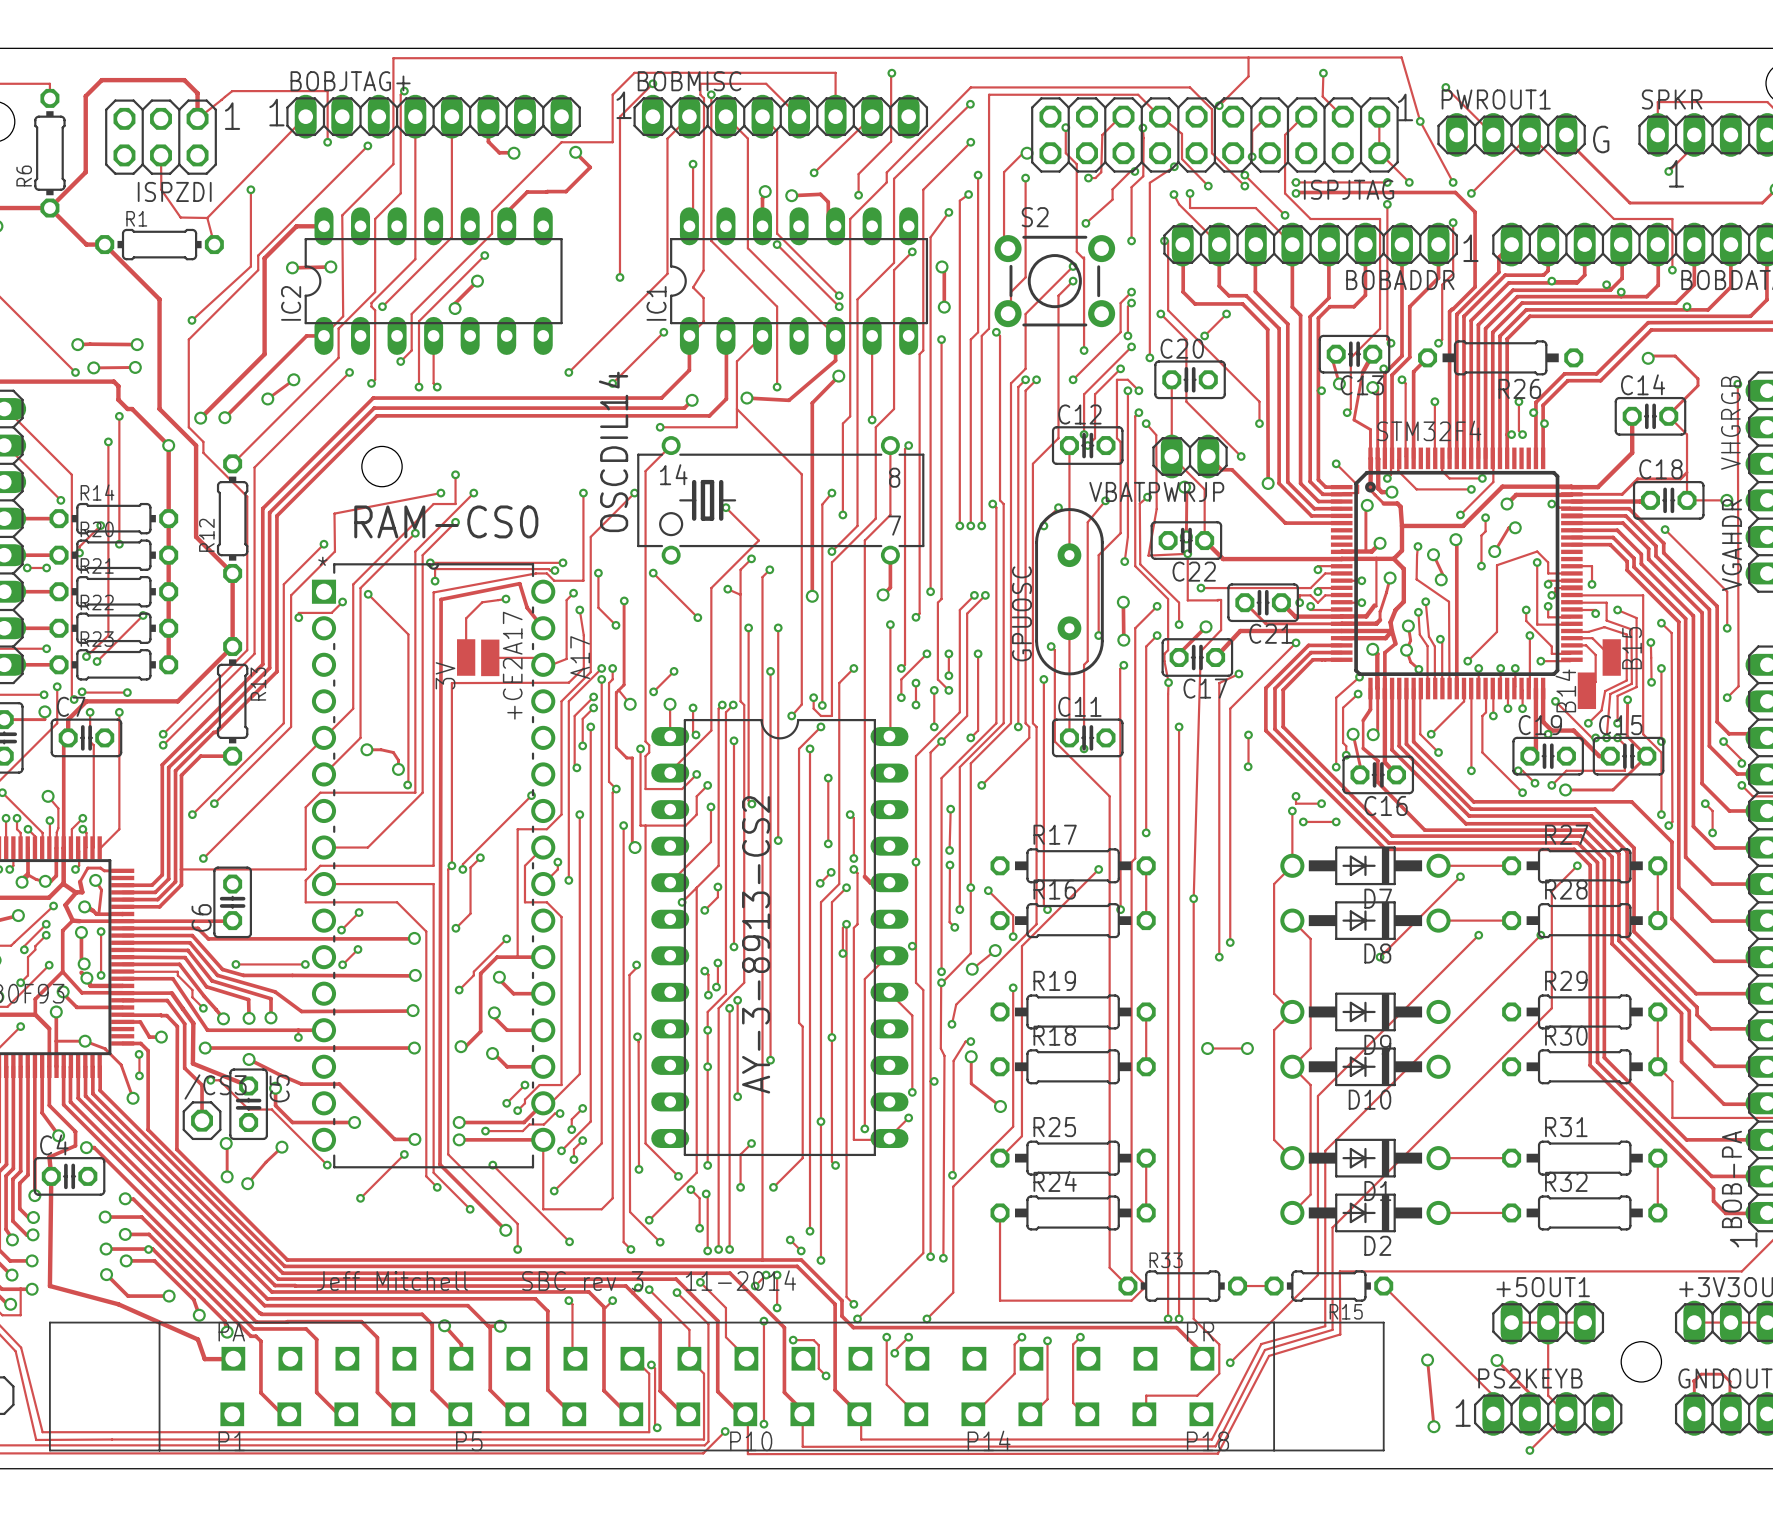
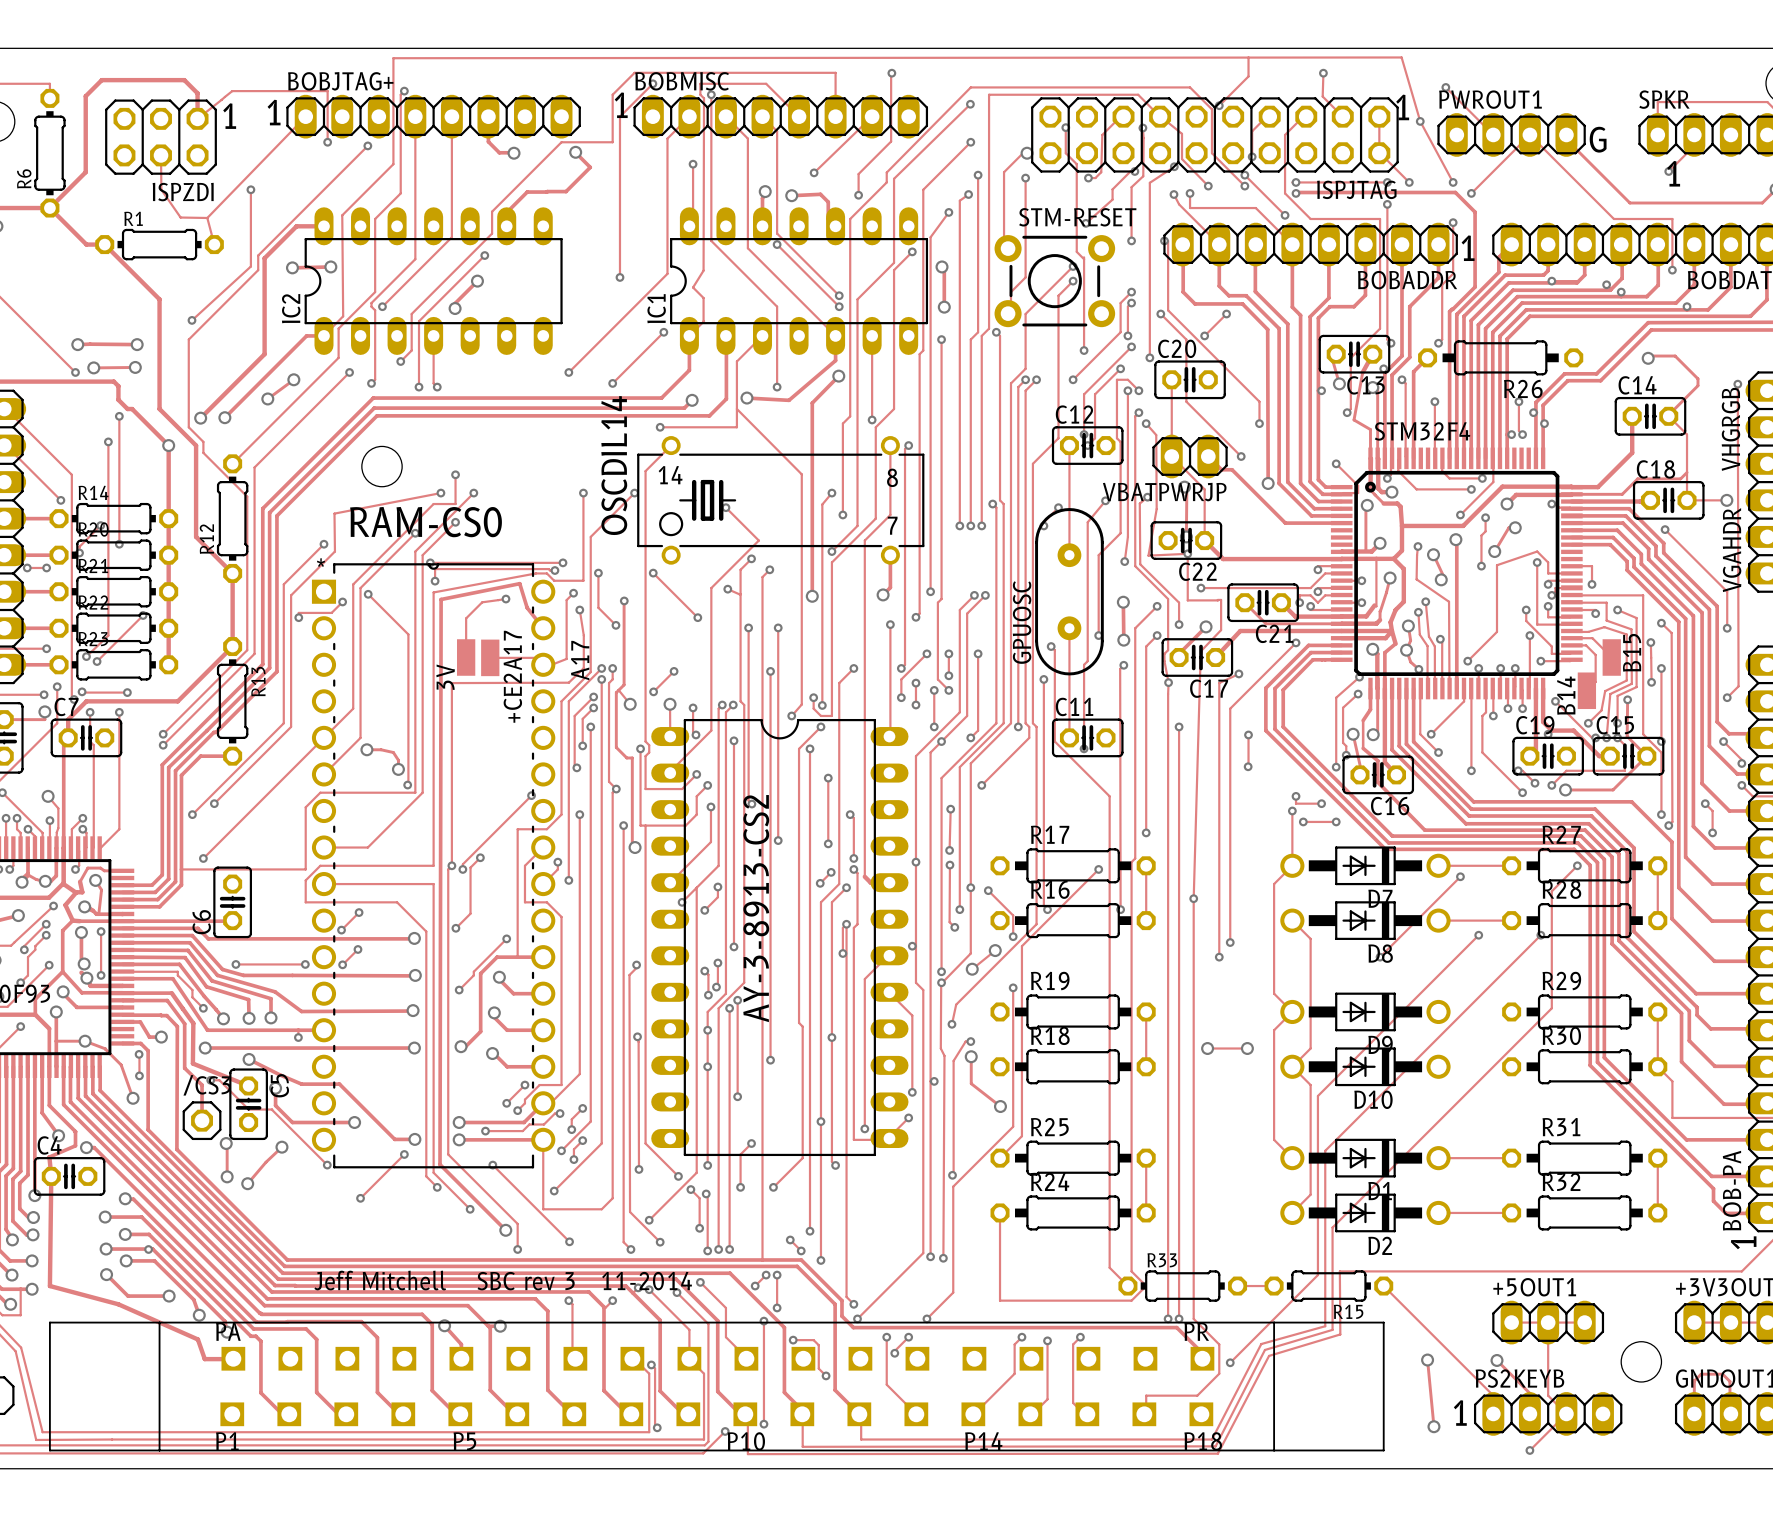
S2 name: S2 (1035, 217) -> STM-RESET (1077, 217)

